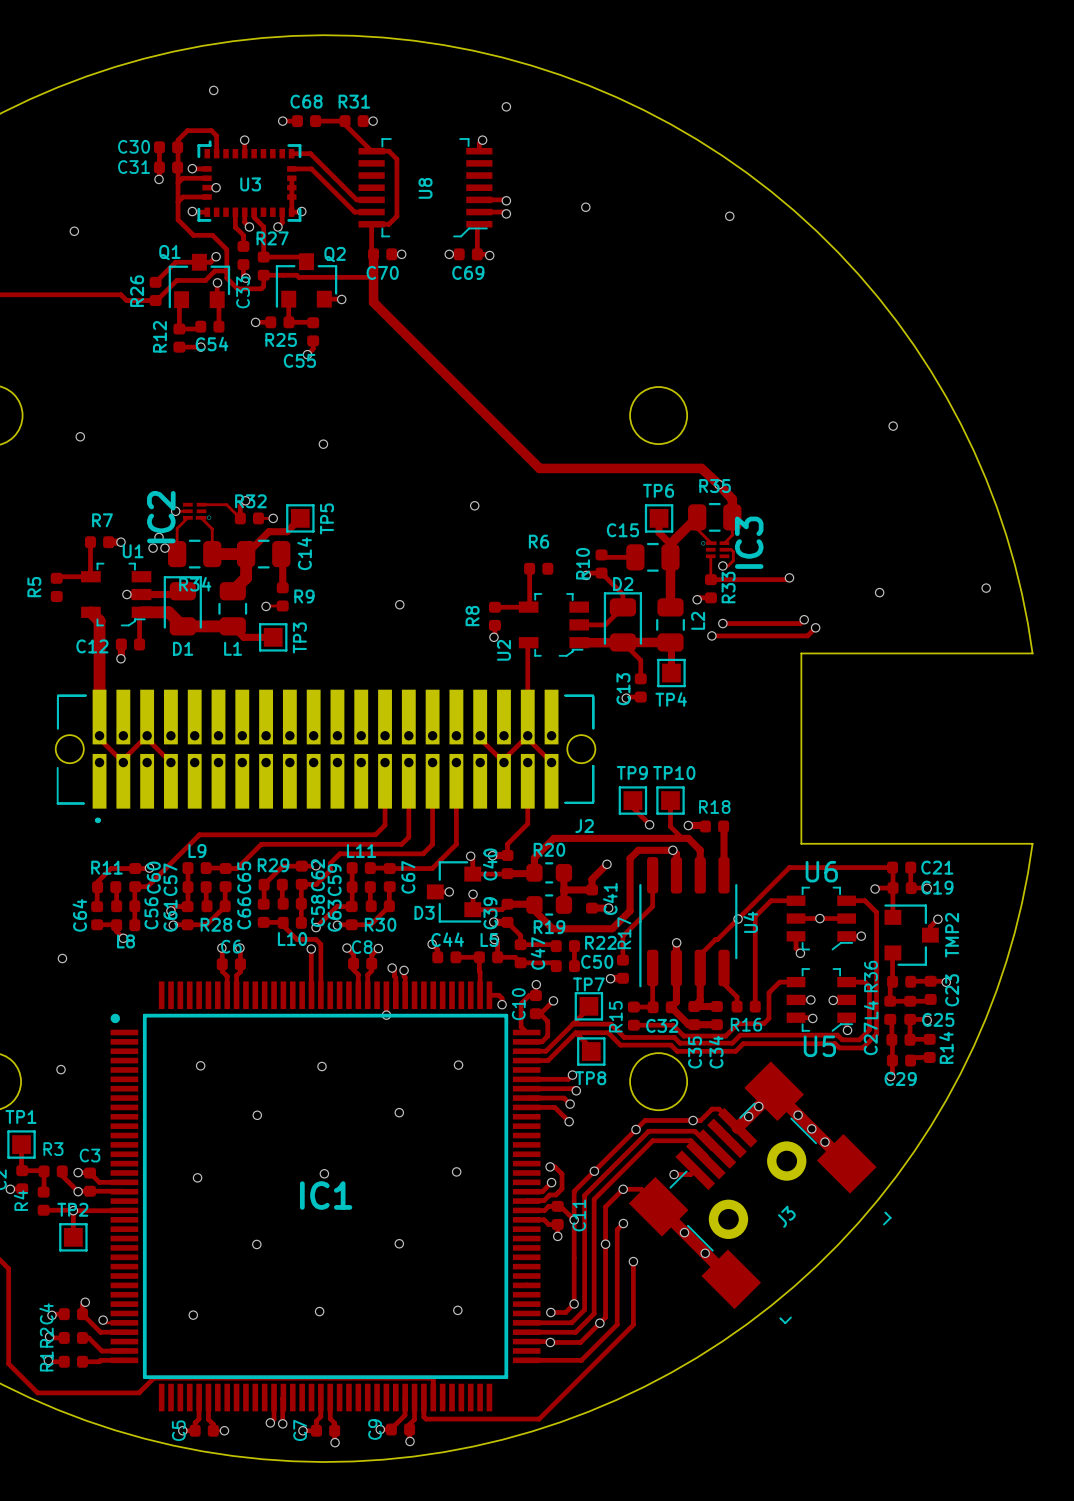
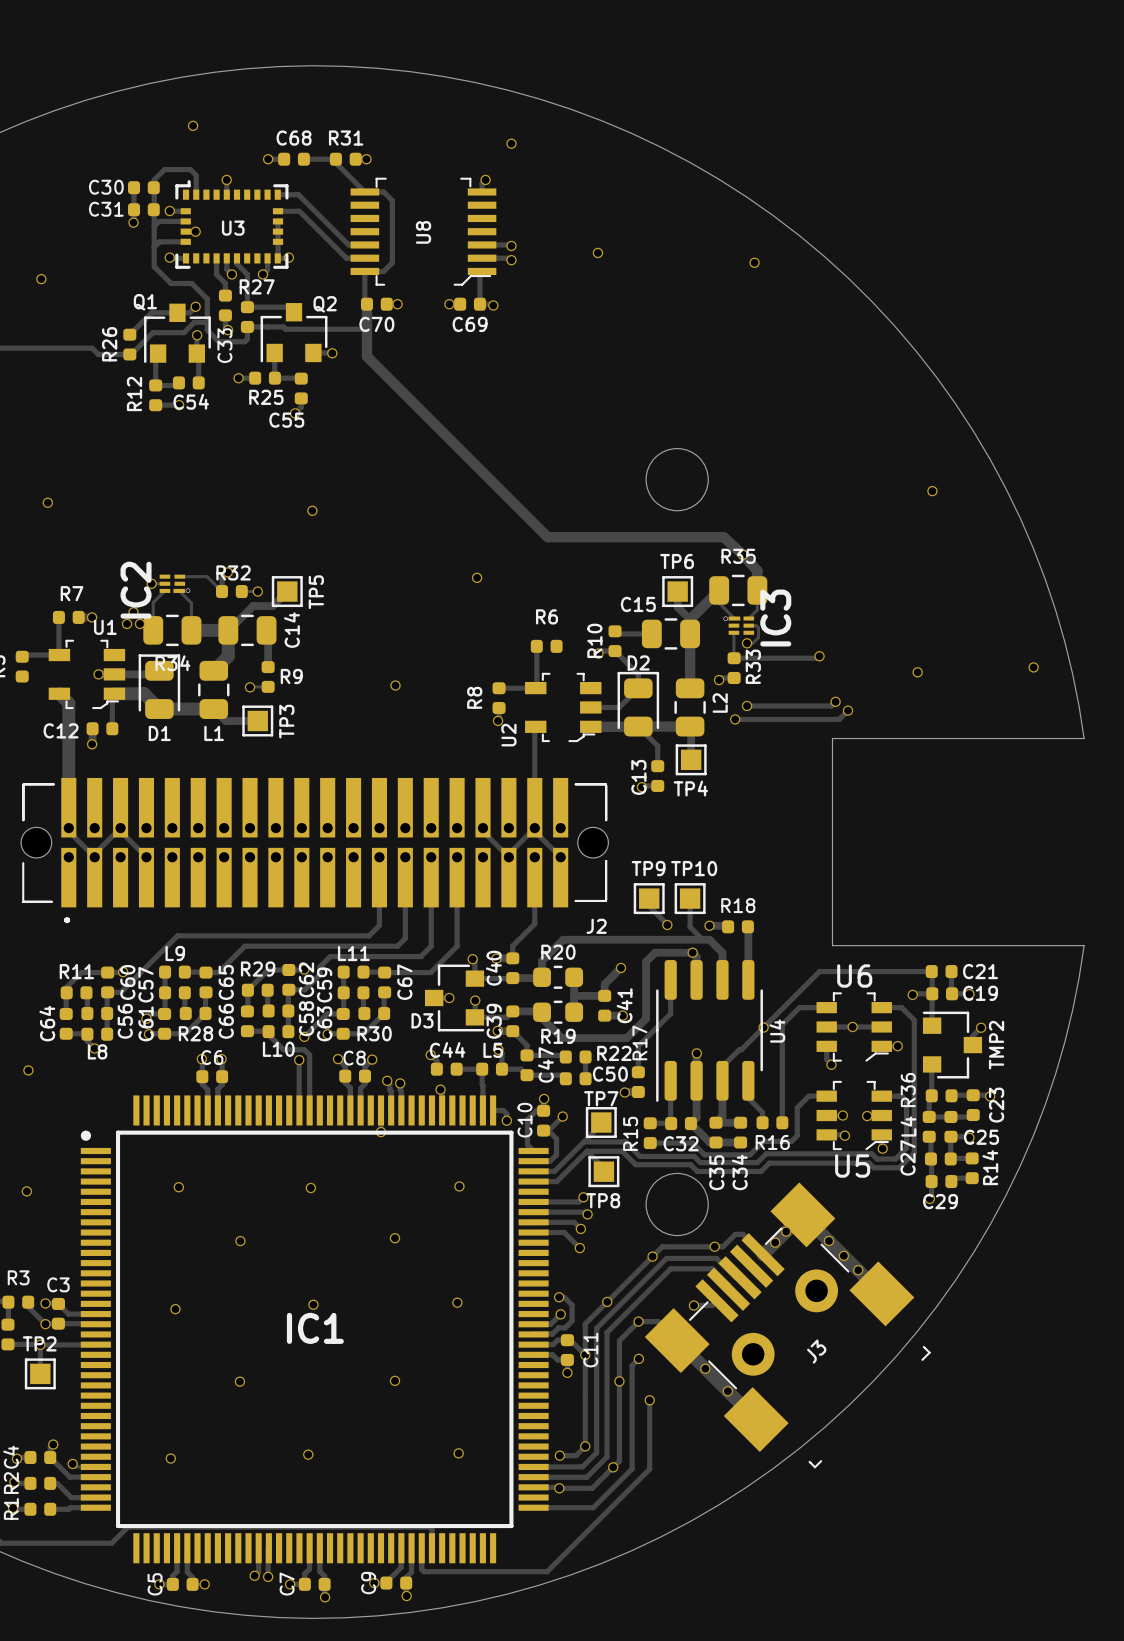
via: none -> (440, 1089)

